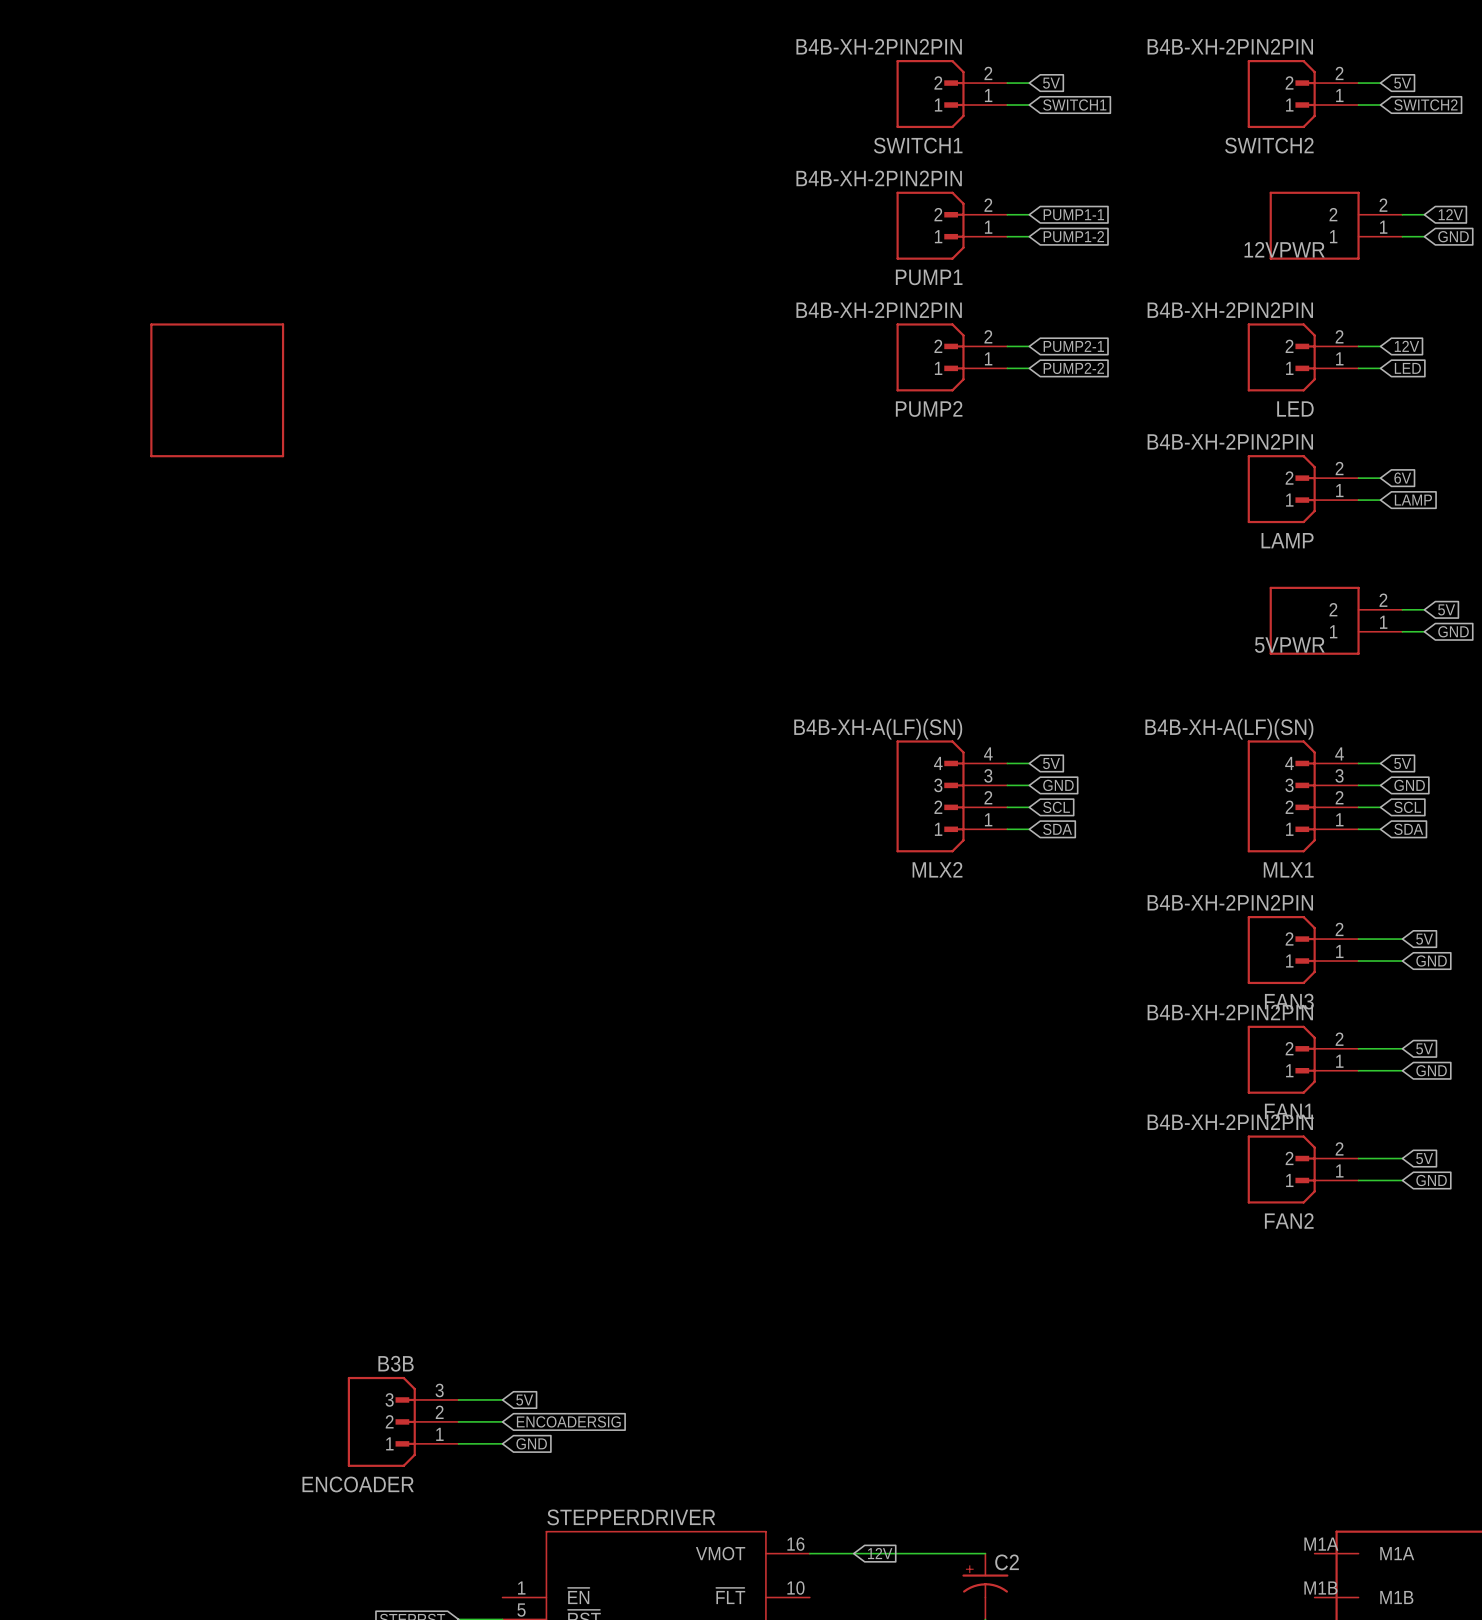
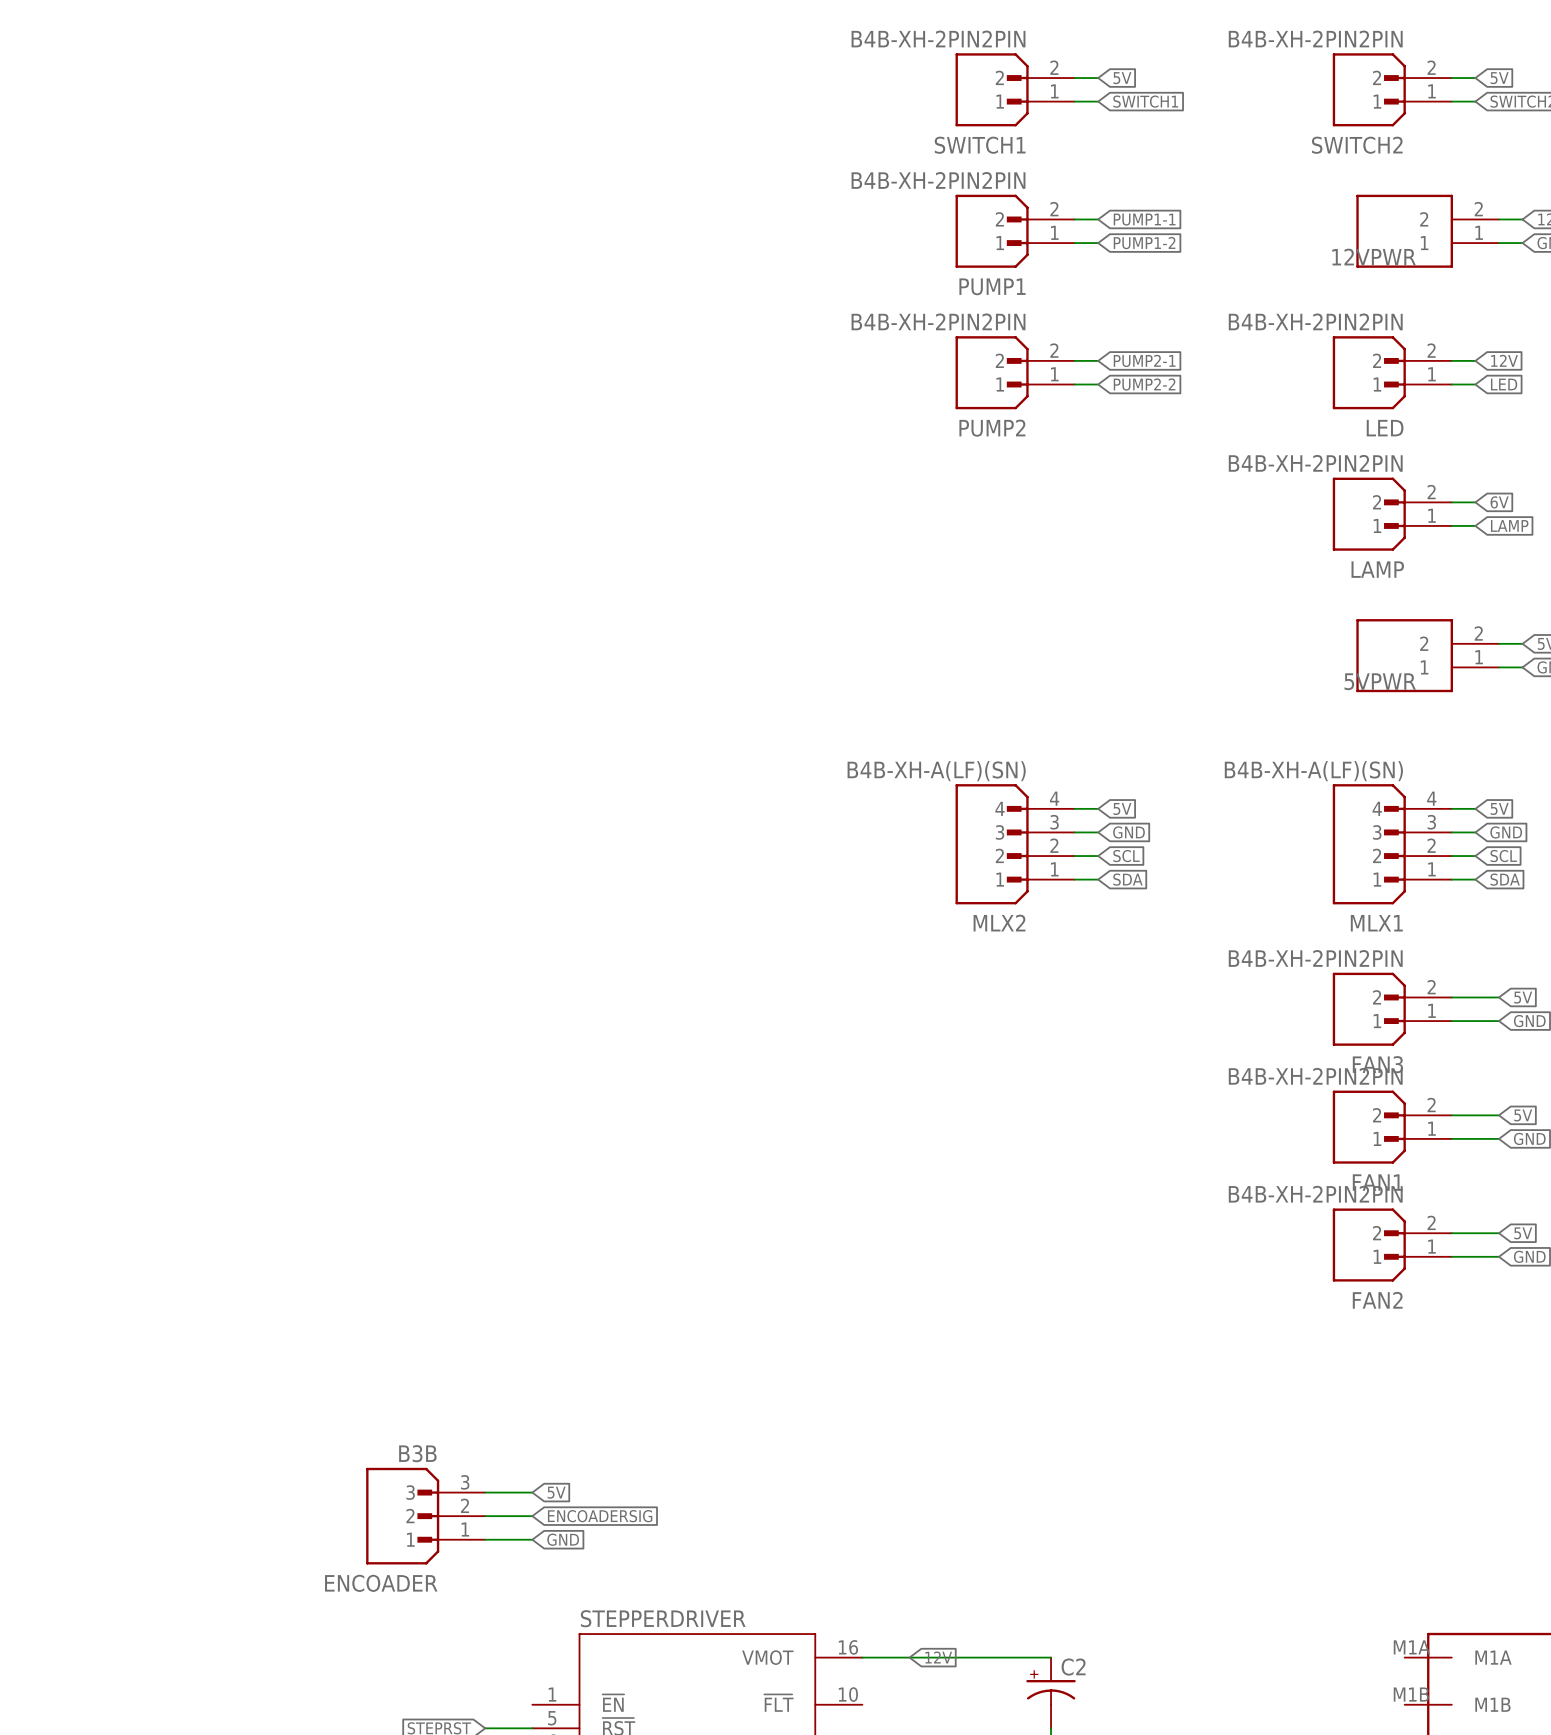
part: (217, 390) -> none

